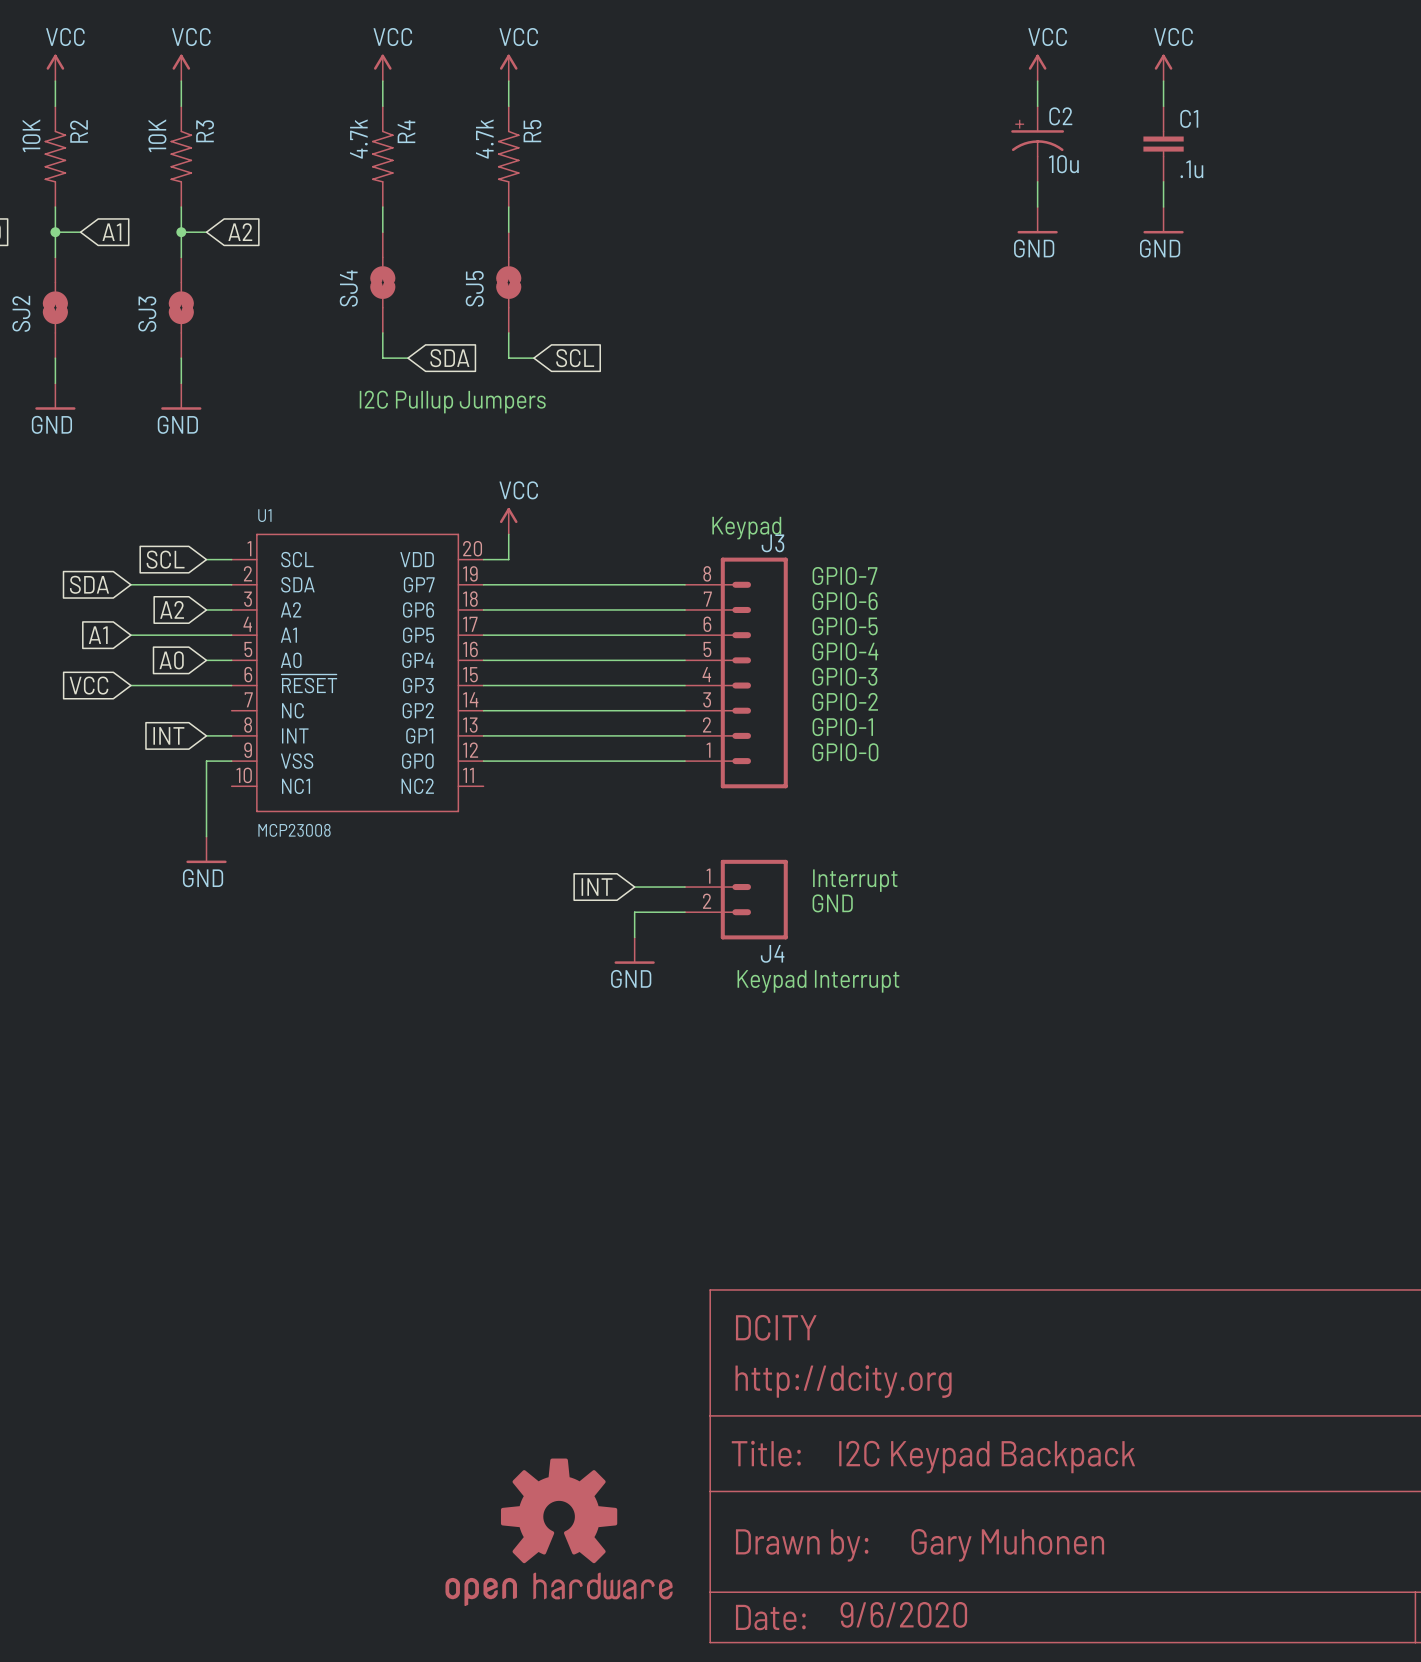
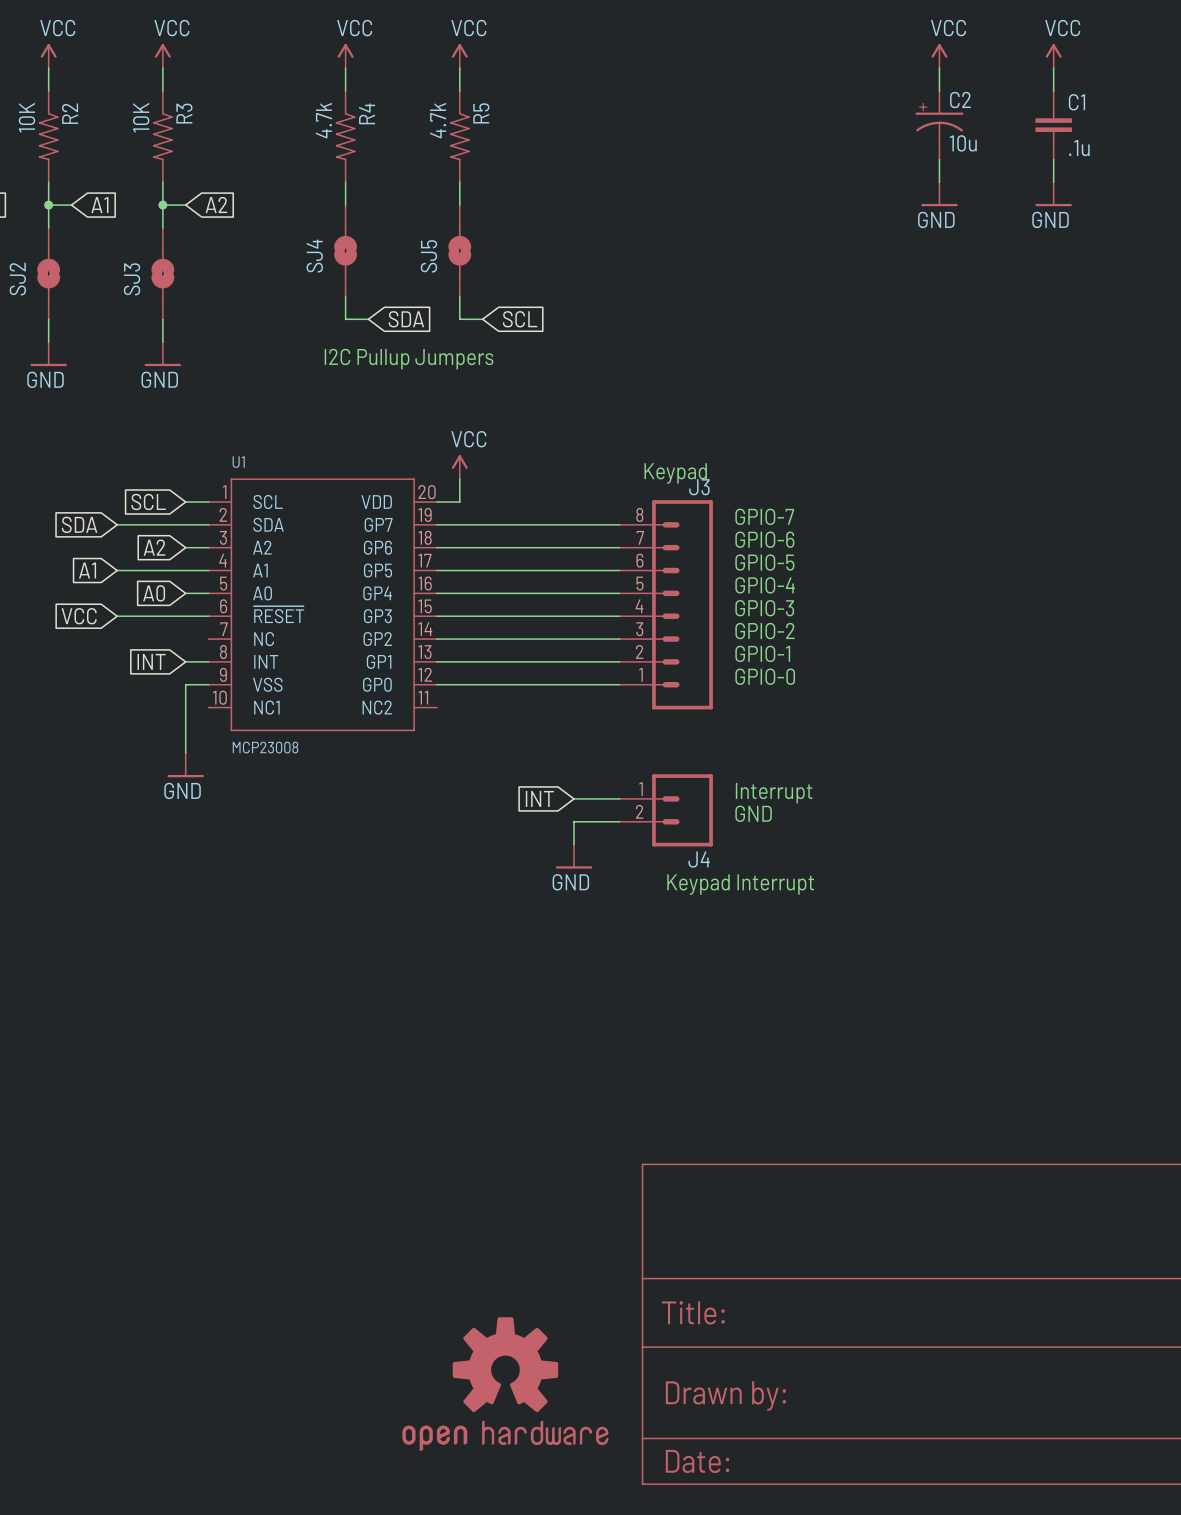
part text: DCITY (776, 1327) -> none
part text: http://dcity.org (843, 1381) -> none
part text: I2C Keypad Backpack (987, 1457) -> none
part text: Gary Muhonen (1007, 1545) -> none
part text: 9/6/2020 (903, 1614) -> none

